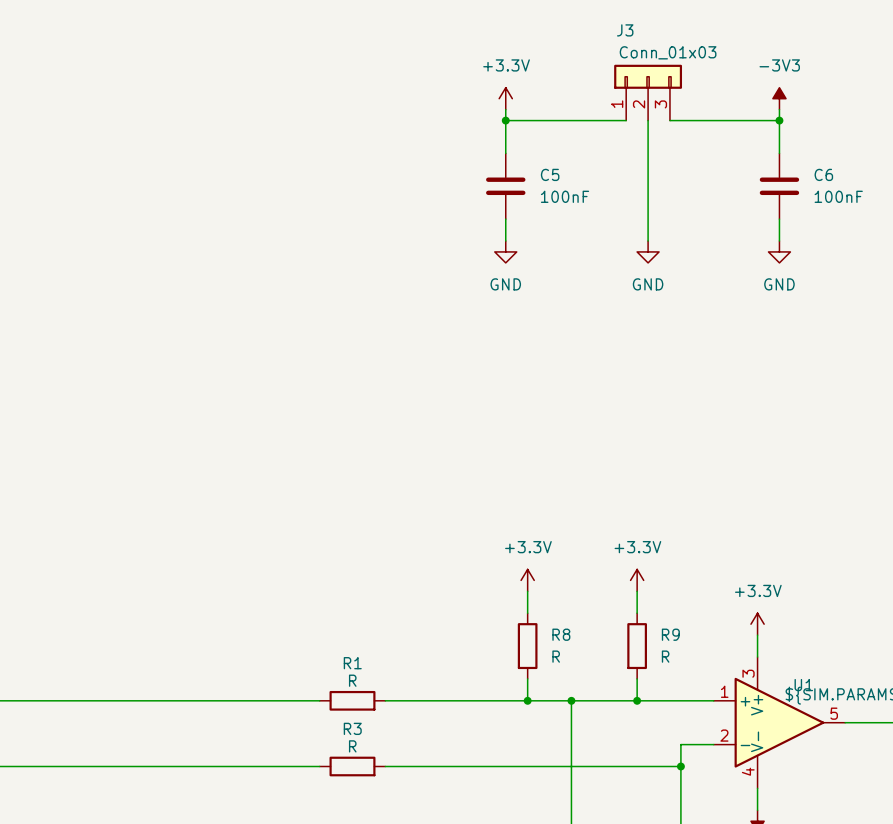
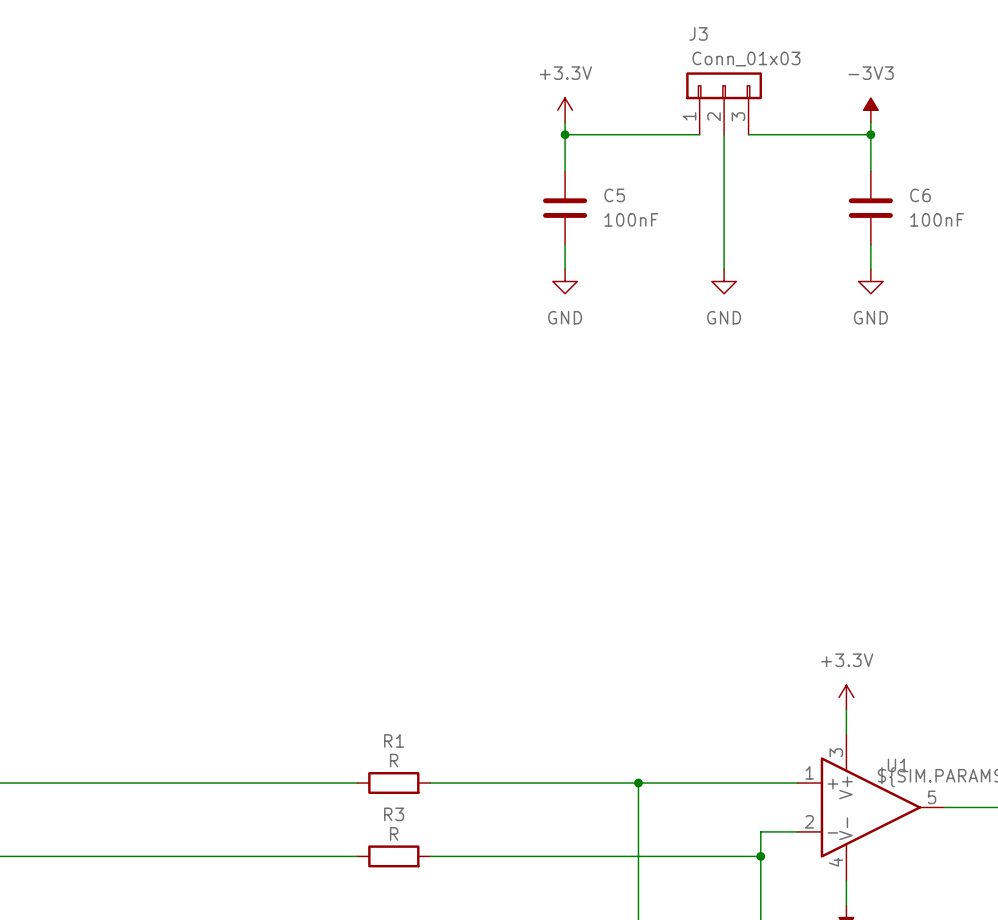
power symbol: +3.3V (527, 580) -> none
power symbol: +3.3V (637, 580) -> none
wire: (527, 591) (527, 613) -> none
wire: (637, 591) (637, 613) -> none
R8: R (527, 646) -> none
R9: R (637, 646) -> none
wire: (527, 678) (527, 700) -> none
wire: (637, 678) (637, 700) -> none
junction: (527, 700) -> none
junction: (637, 700) -> none

